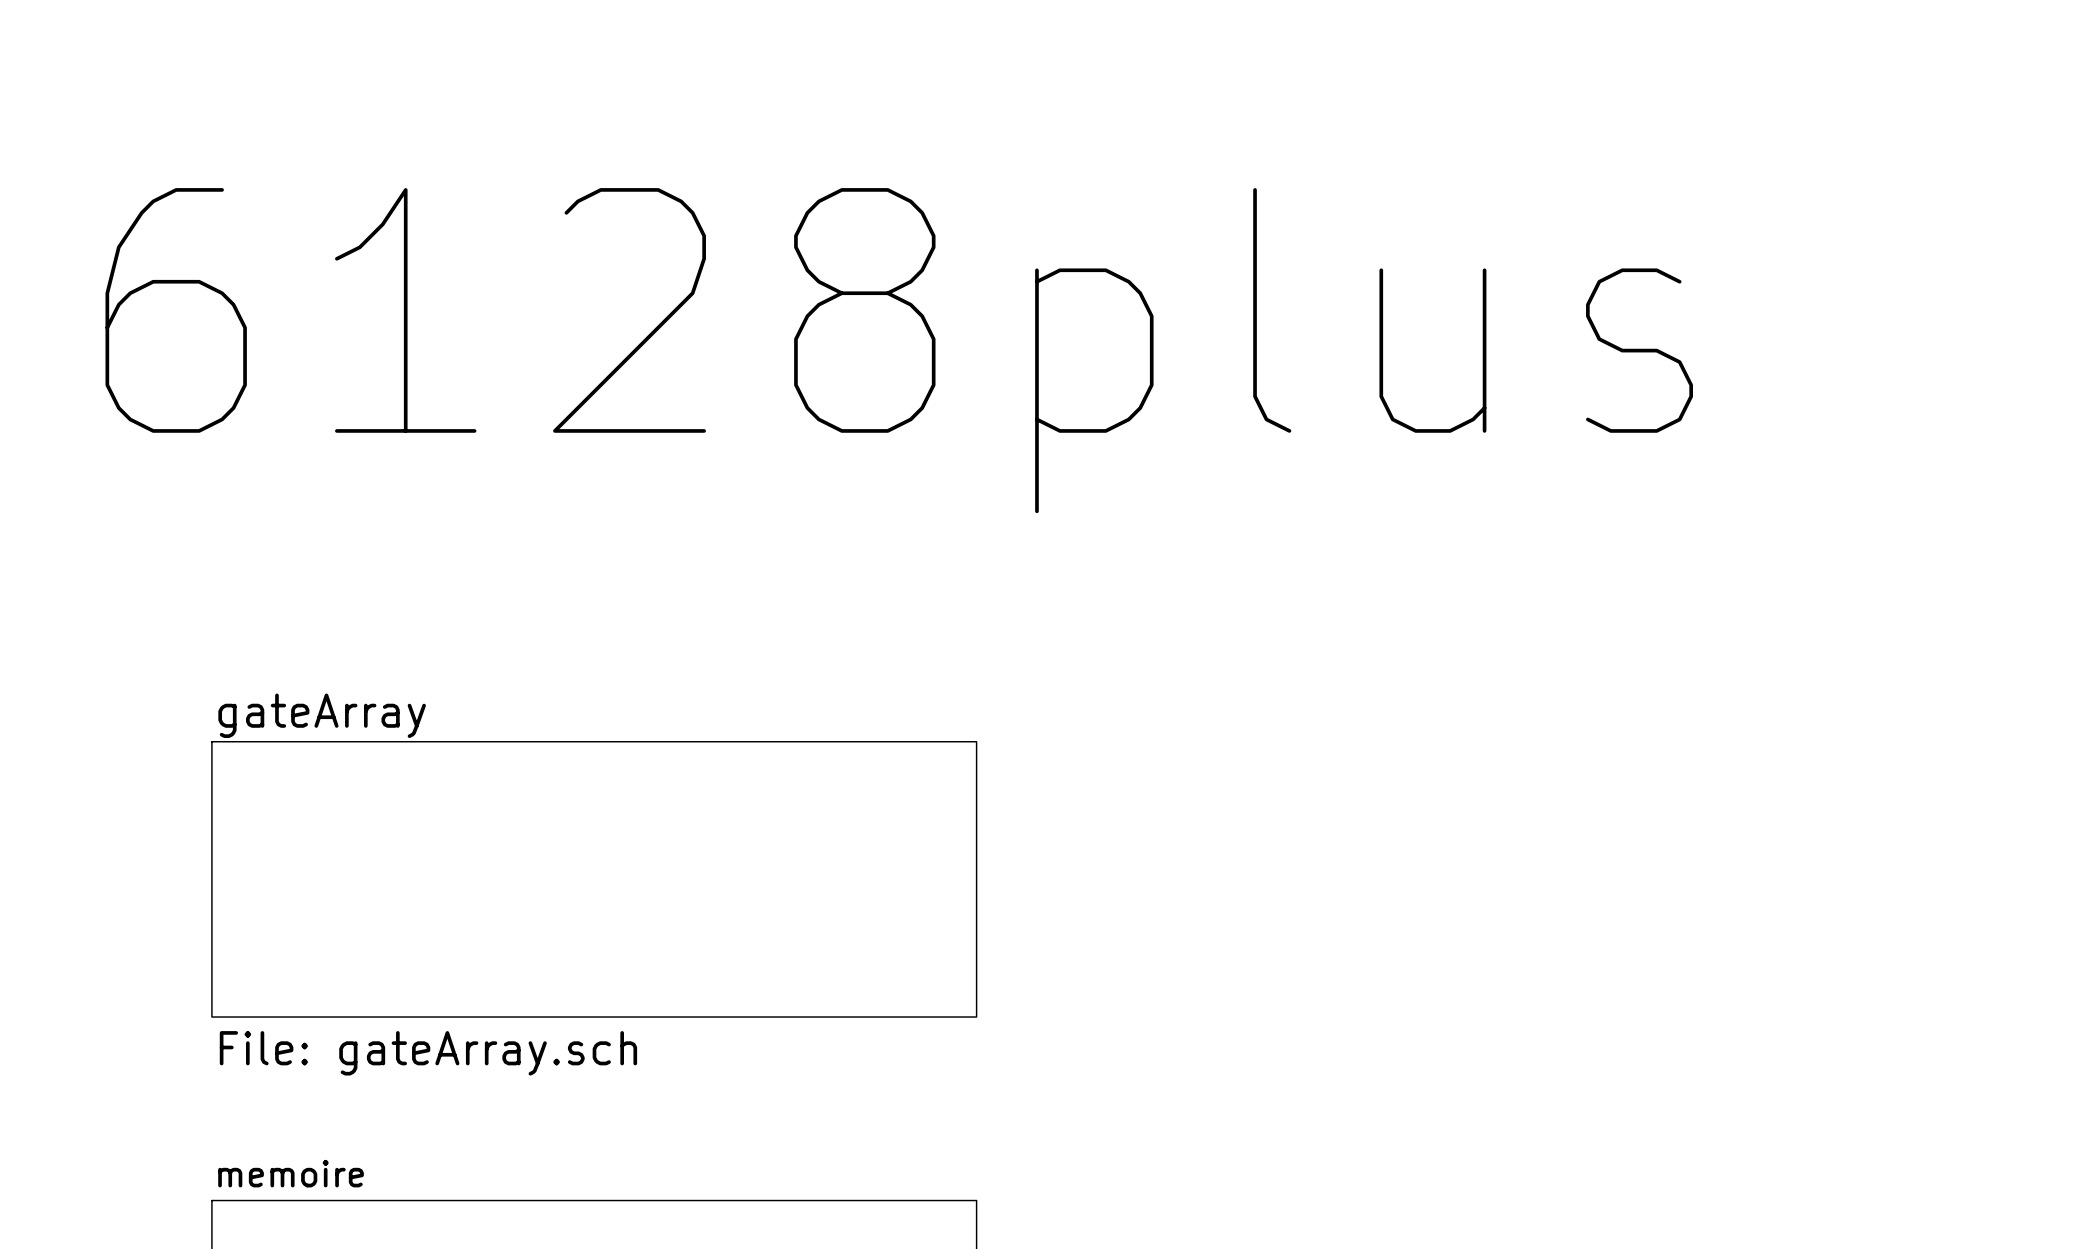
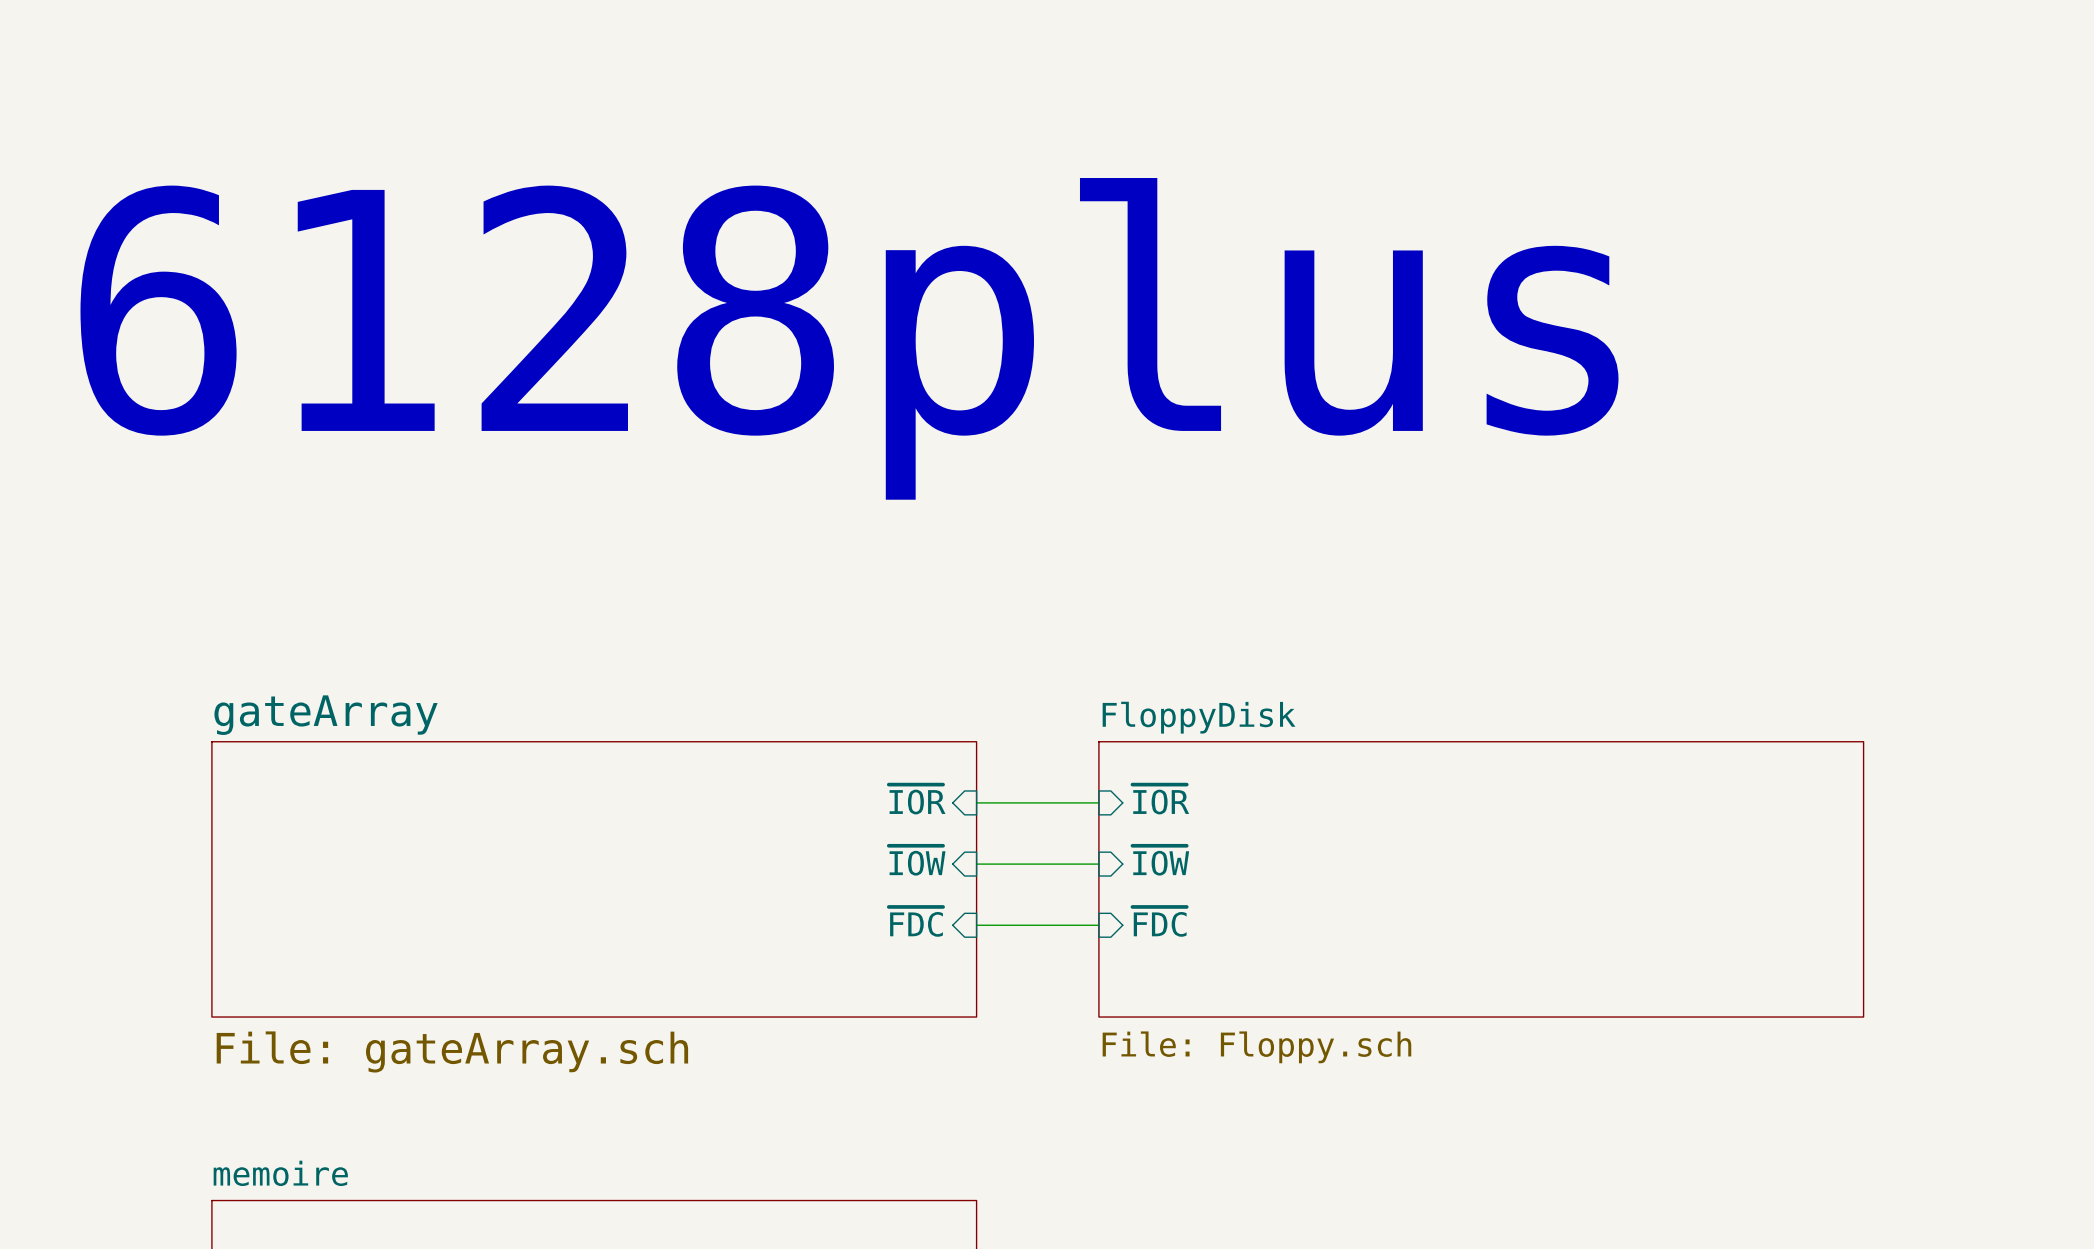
sheet pin: none -> ~{IOR} (917, 799)
sheet pin: none -> ~{IOR} (1160, 799)
wire: none -> (976, 802) (1098, 802)
sheet pin: none -> ~{IOW} (917, 860)
sheet pin: none -> ~{IOW} (1160, 860)
wire: none -> (976, 864) (1098, 864)
sheet FloppyDisk: none -> File: Floppy.sch (1481, 879)
sheet pin: none -> ~{FDC} (915, 921)
sheet pin: none -> ~{FDC} (1159, 921)
wire: none -> (976, 925) (1098, 925)

